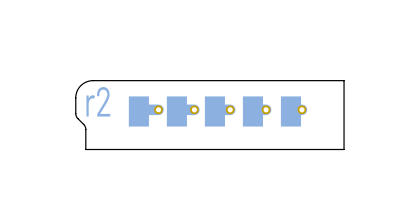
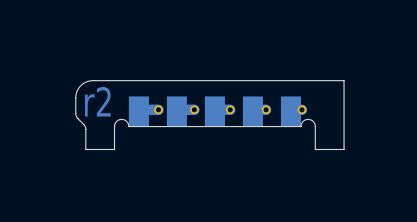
board edge: (315, 149) (114, 149) -> (315, 149) (315, 124) (308, 119) (303, 121) (300, 126) (128, 126) (126, 121) (120, 119) (114, 124) (114, 149)

